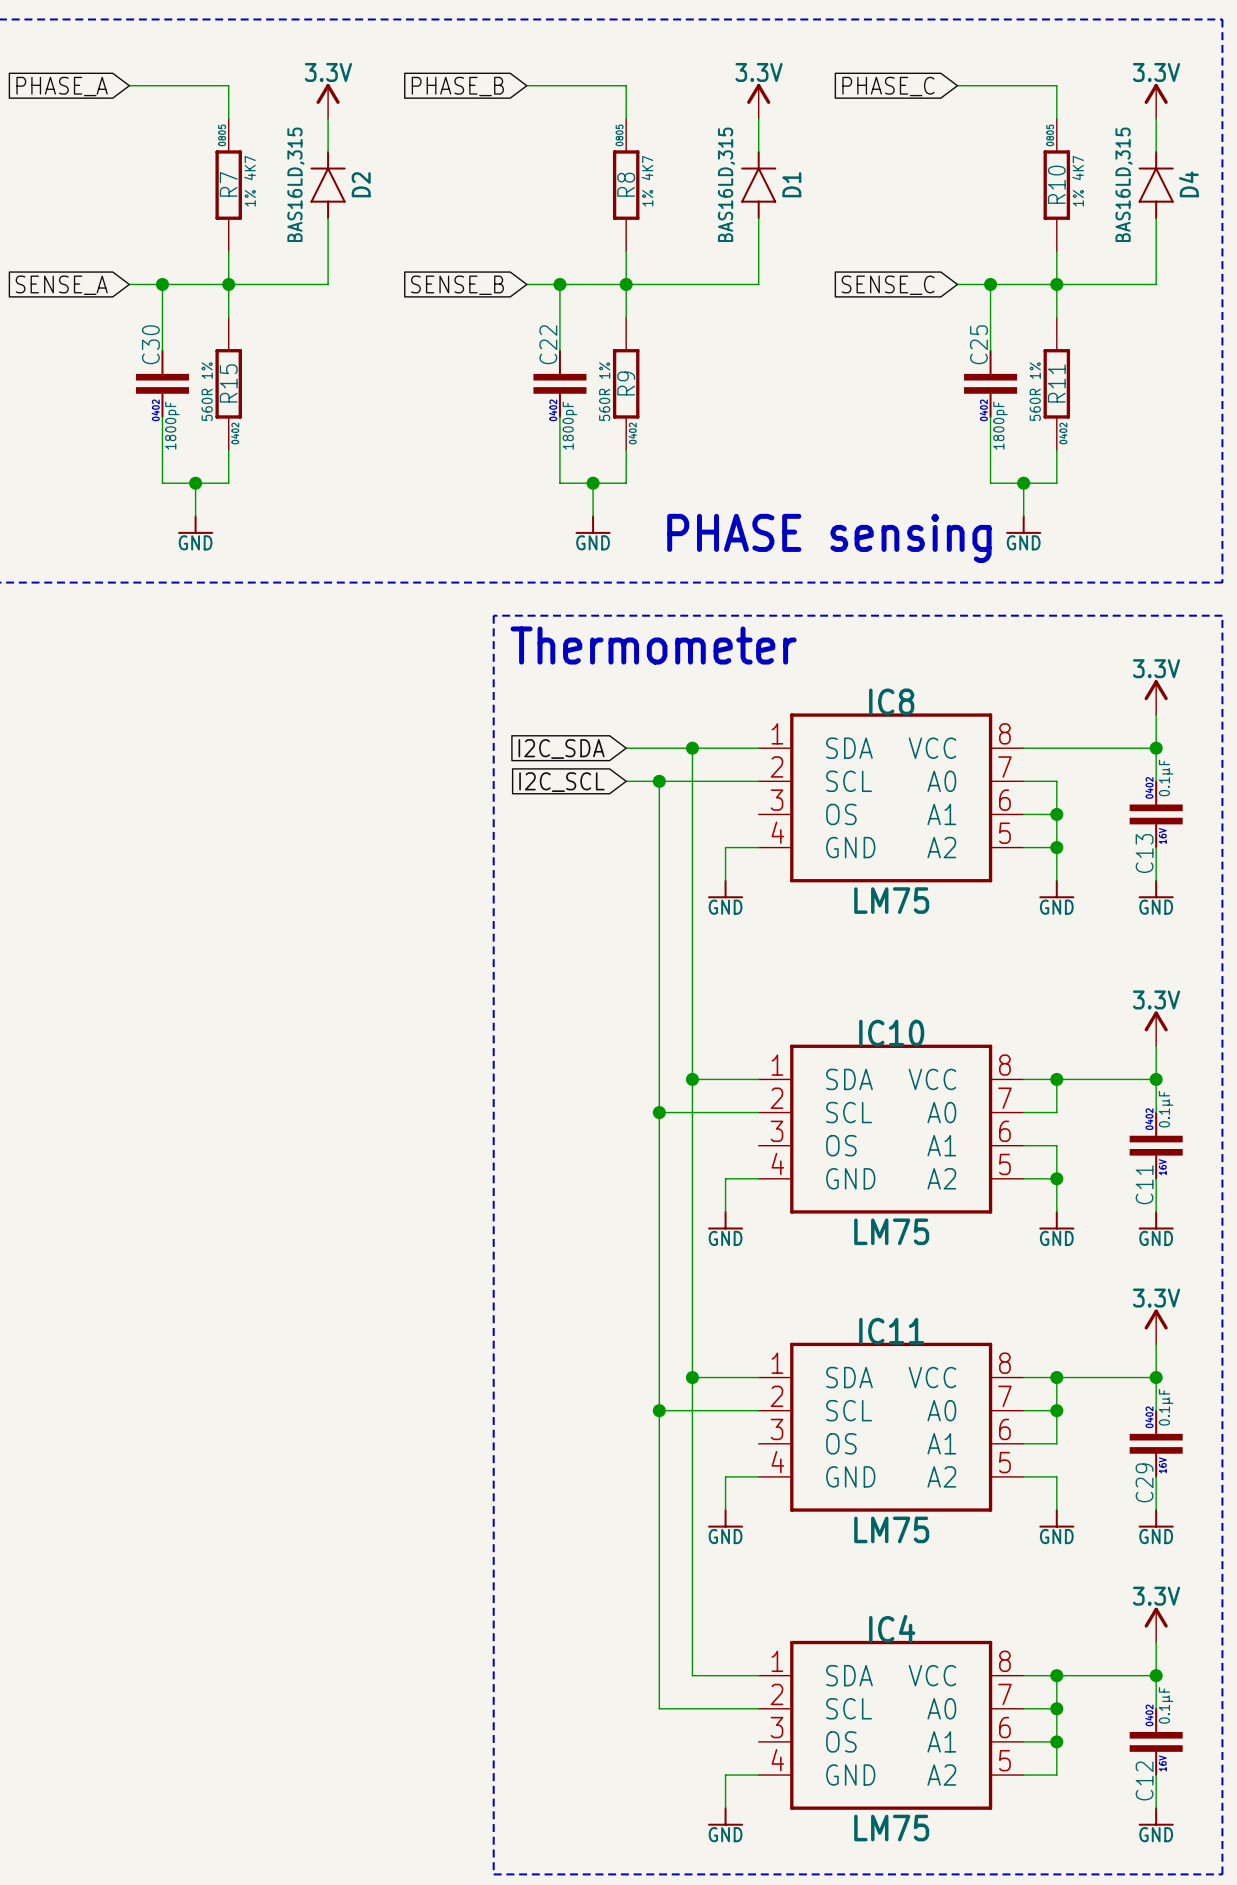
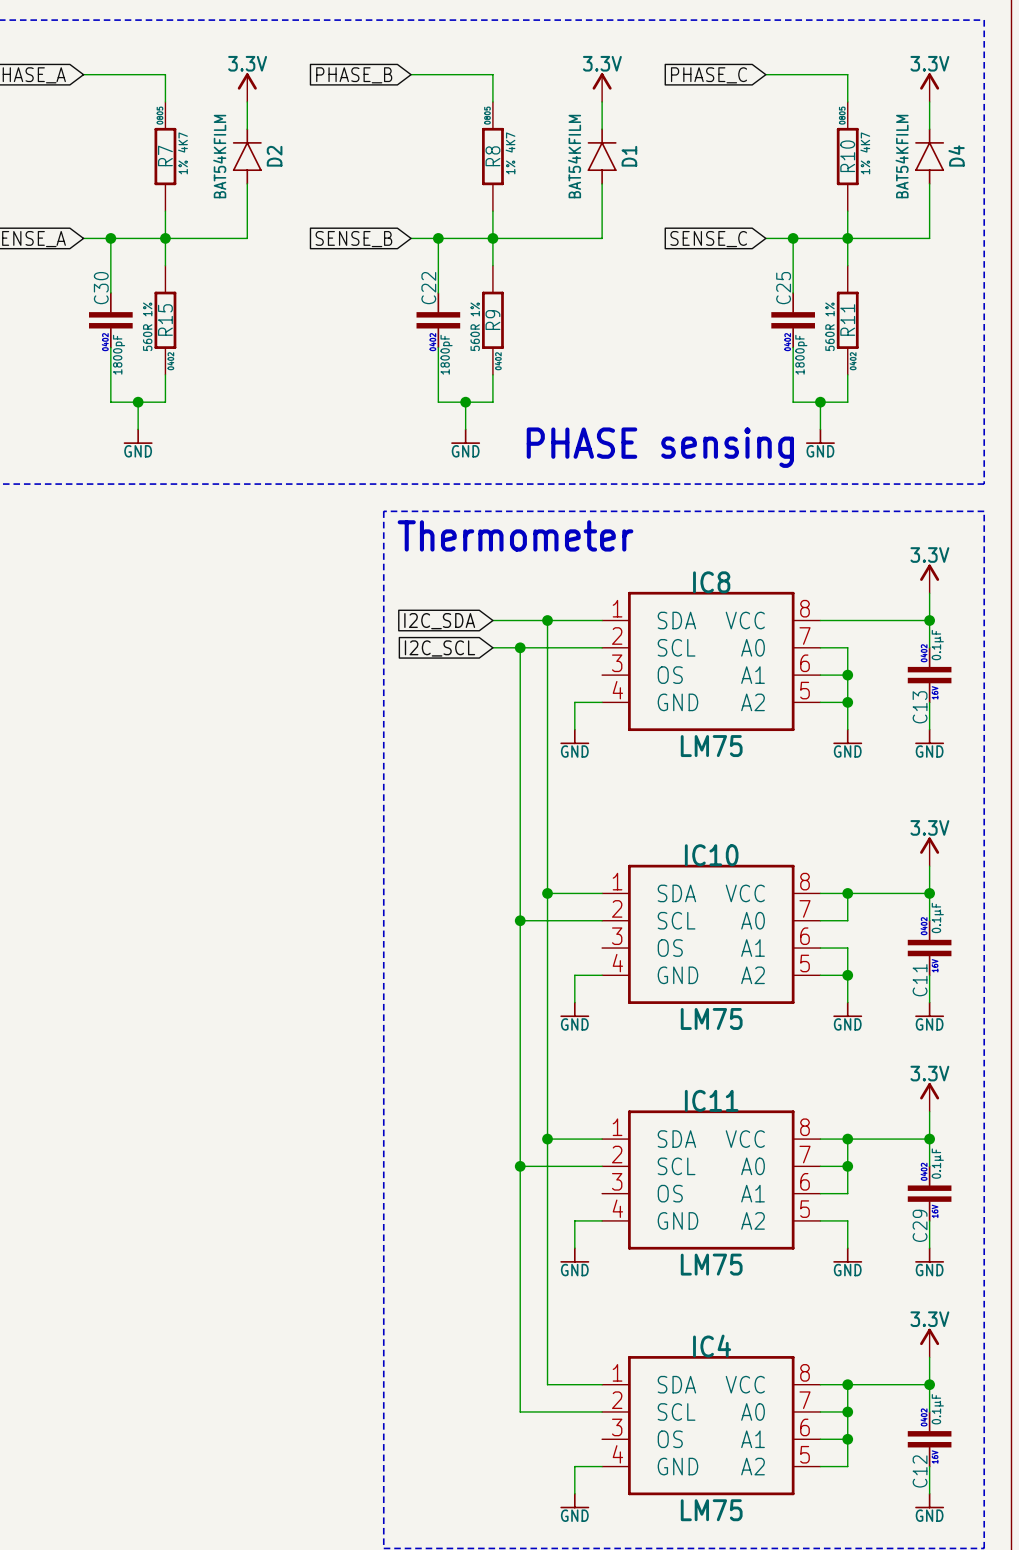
D2 text: BAS16LD,315 (295, 184) -> BAT54KFILM (219, 156)
D1 text: BAS16LD,315 (726, 184) -> BAT54KFILM (574, 156)
D4 text: BAS16LD,315 (1123, 184) -> BAT54KFILM (902, 156)

